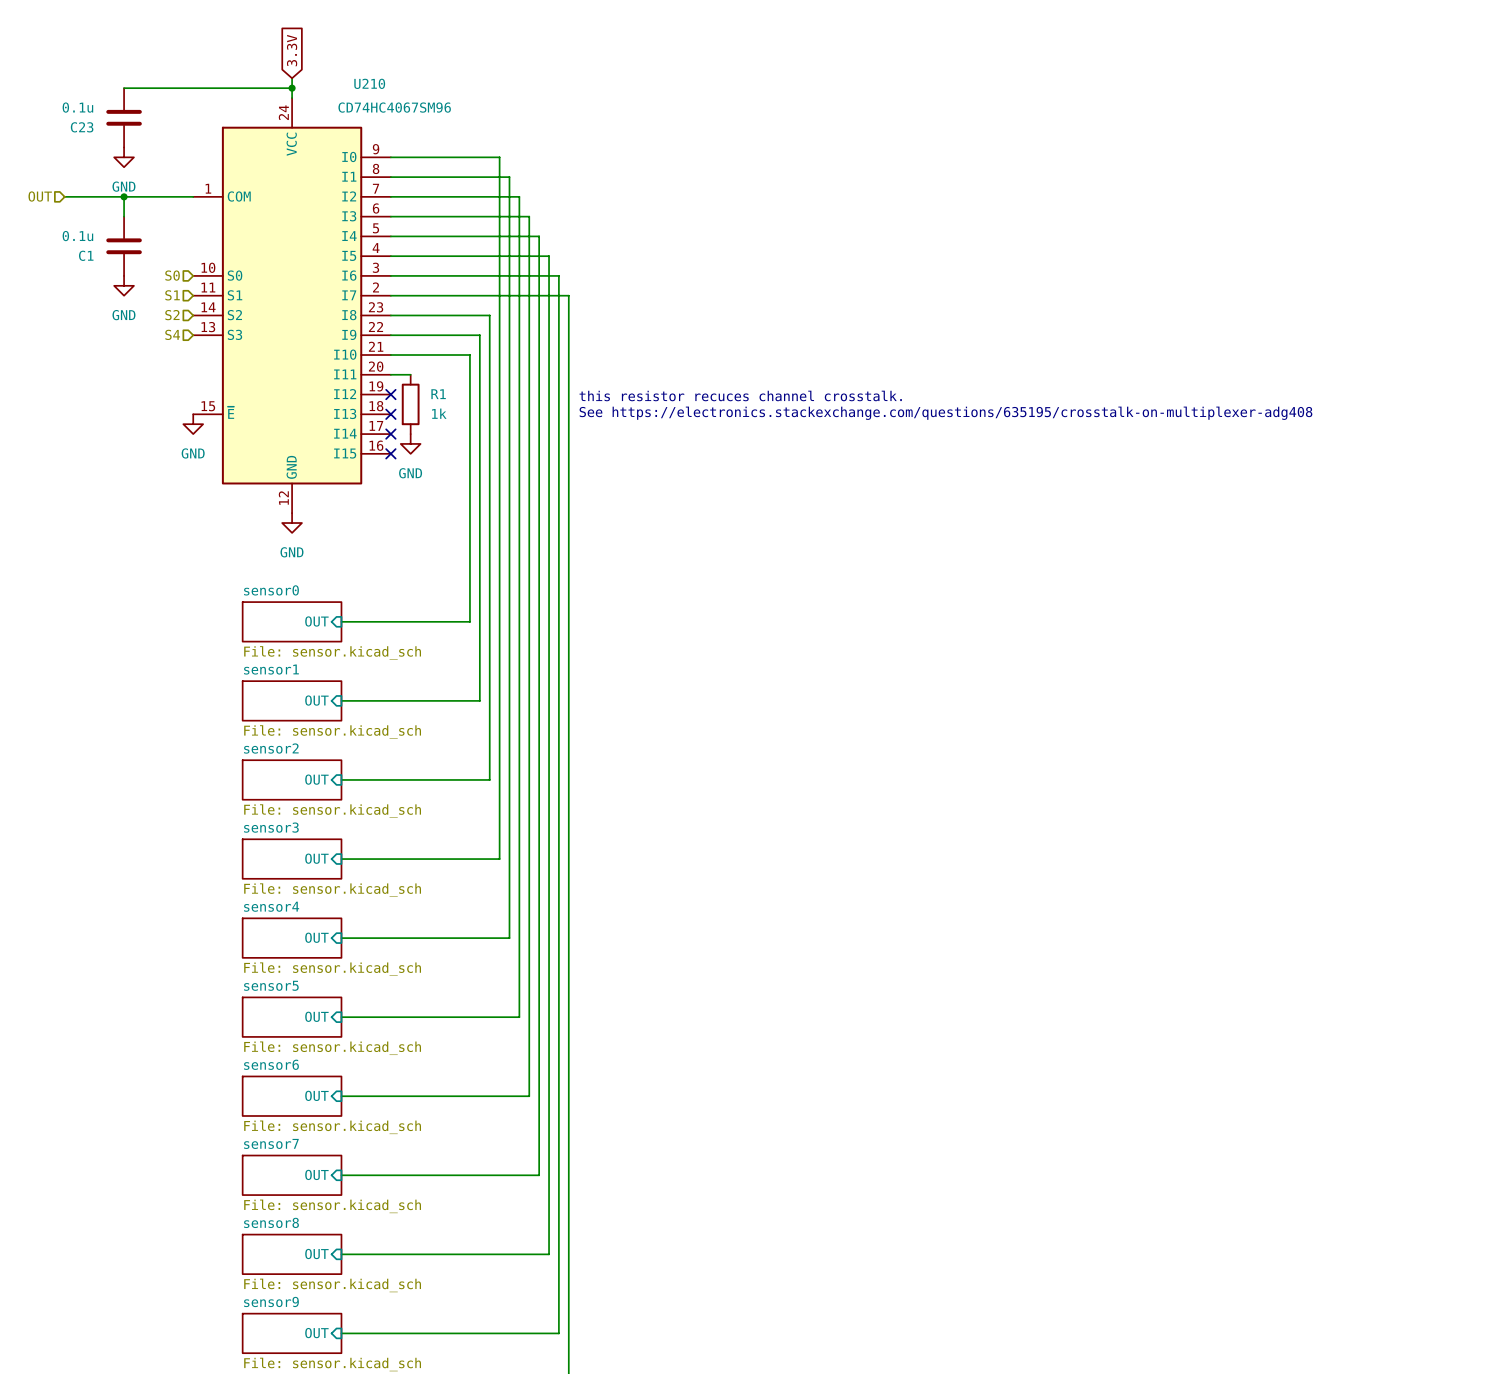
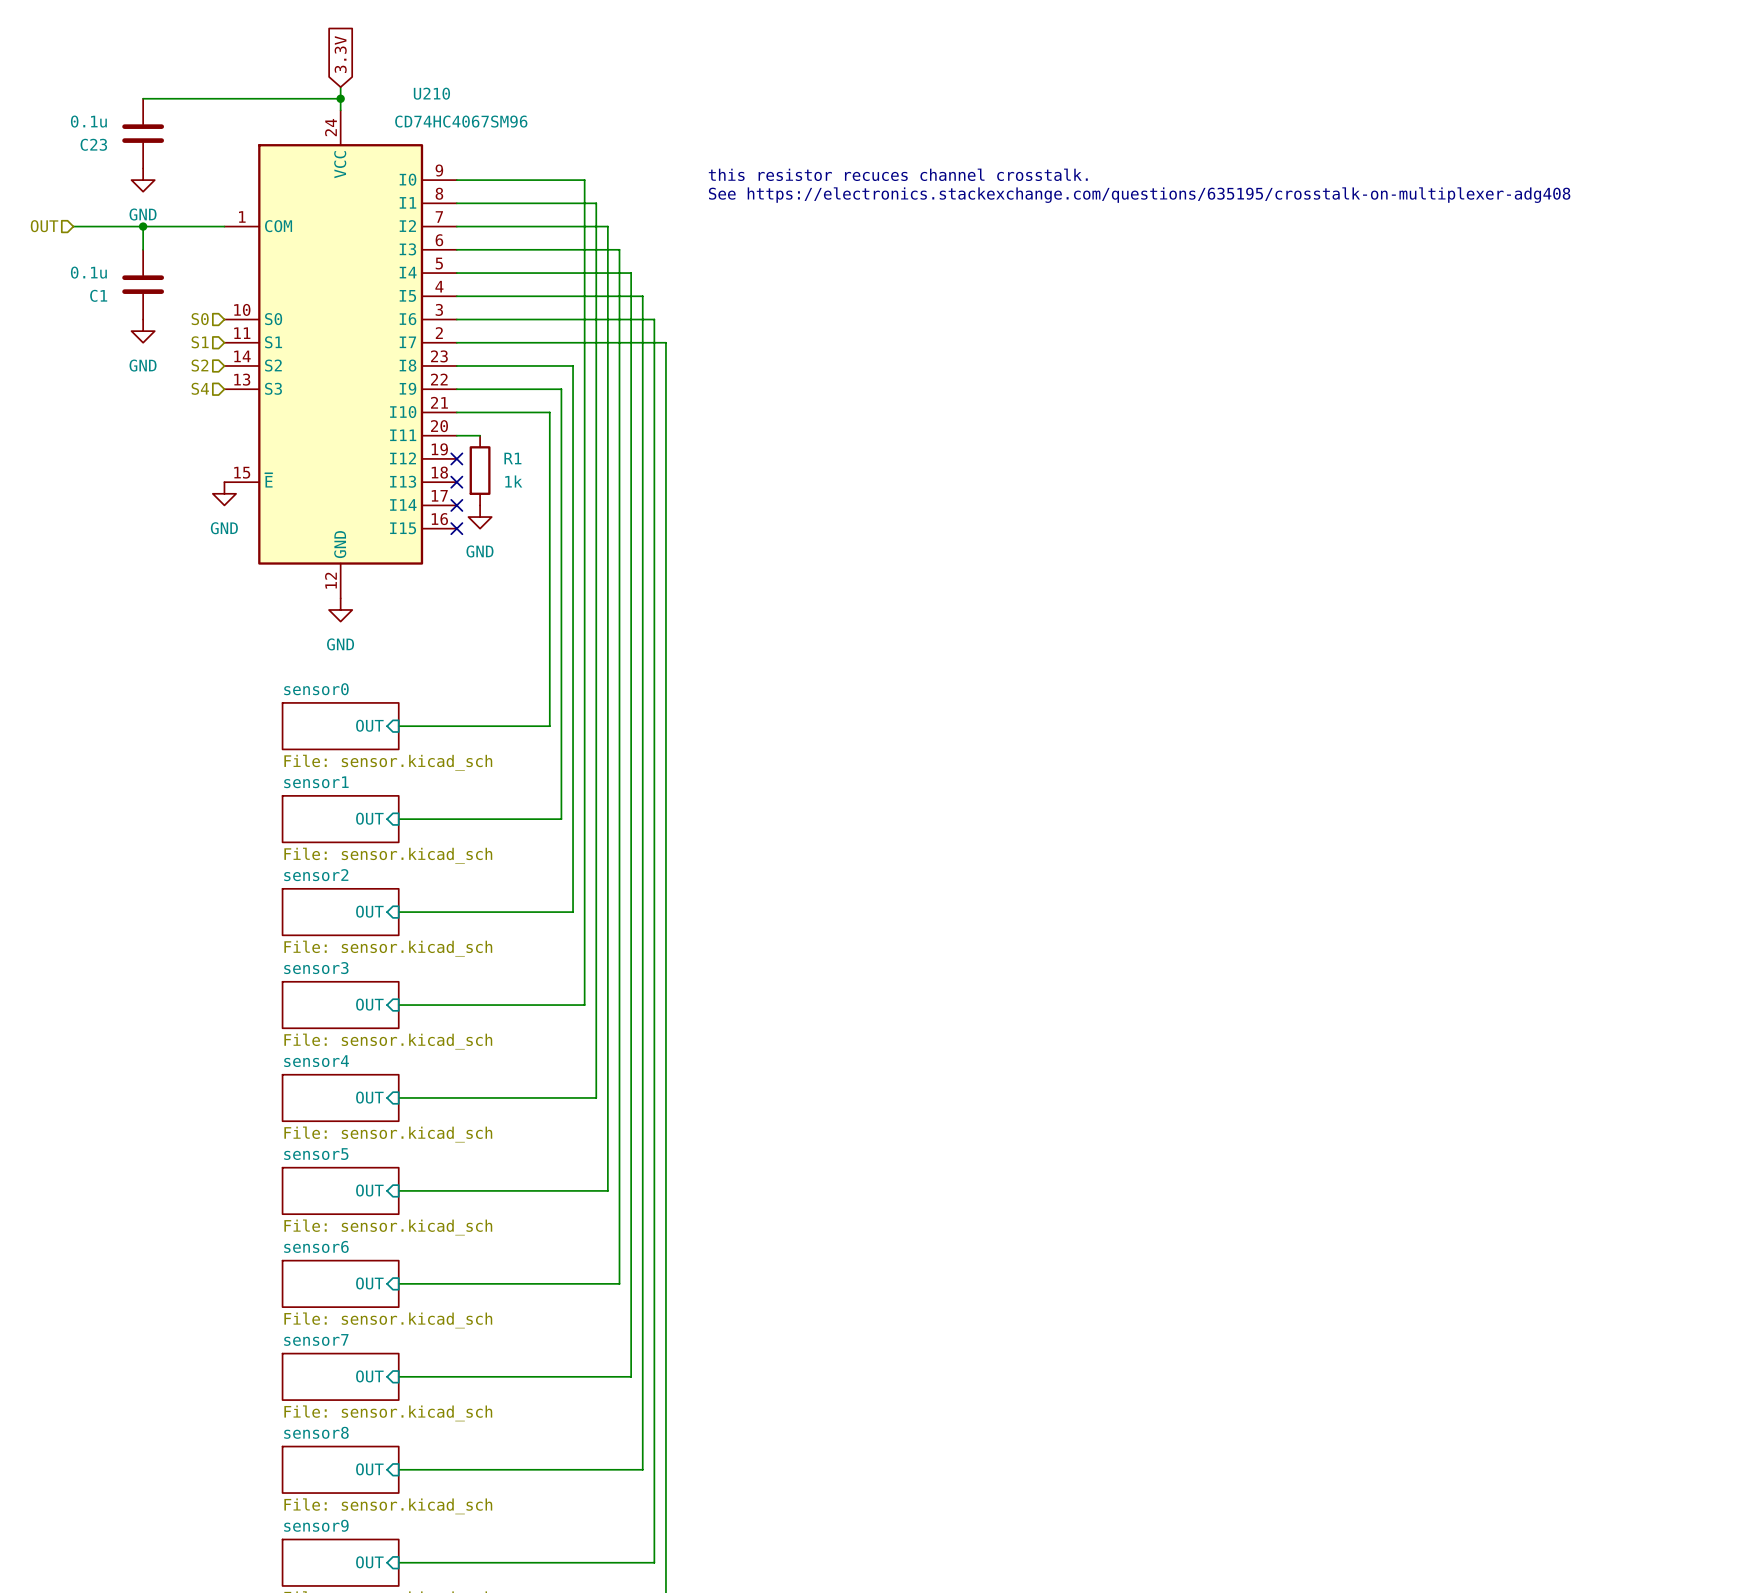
text: none -> this resistor recuces channel crosstalk. (898, 174)
text: none -> See https://electronics.stackexchange.com/questions/635195/crosstalk-on-multiplexer-adg408 (1139, 195)
text: this resistor recuces channel crosstalk. (740, 395) -> none
text: See https://electronics.stackexchange.com/questions/635195/crosstalk-on-multiplexer-adg408 (945, 413) -> none

